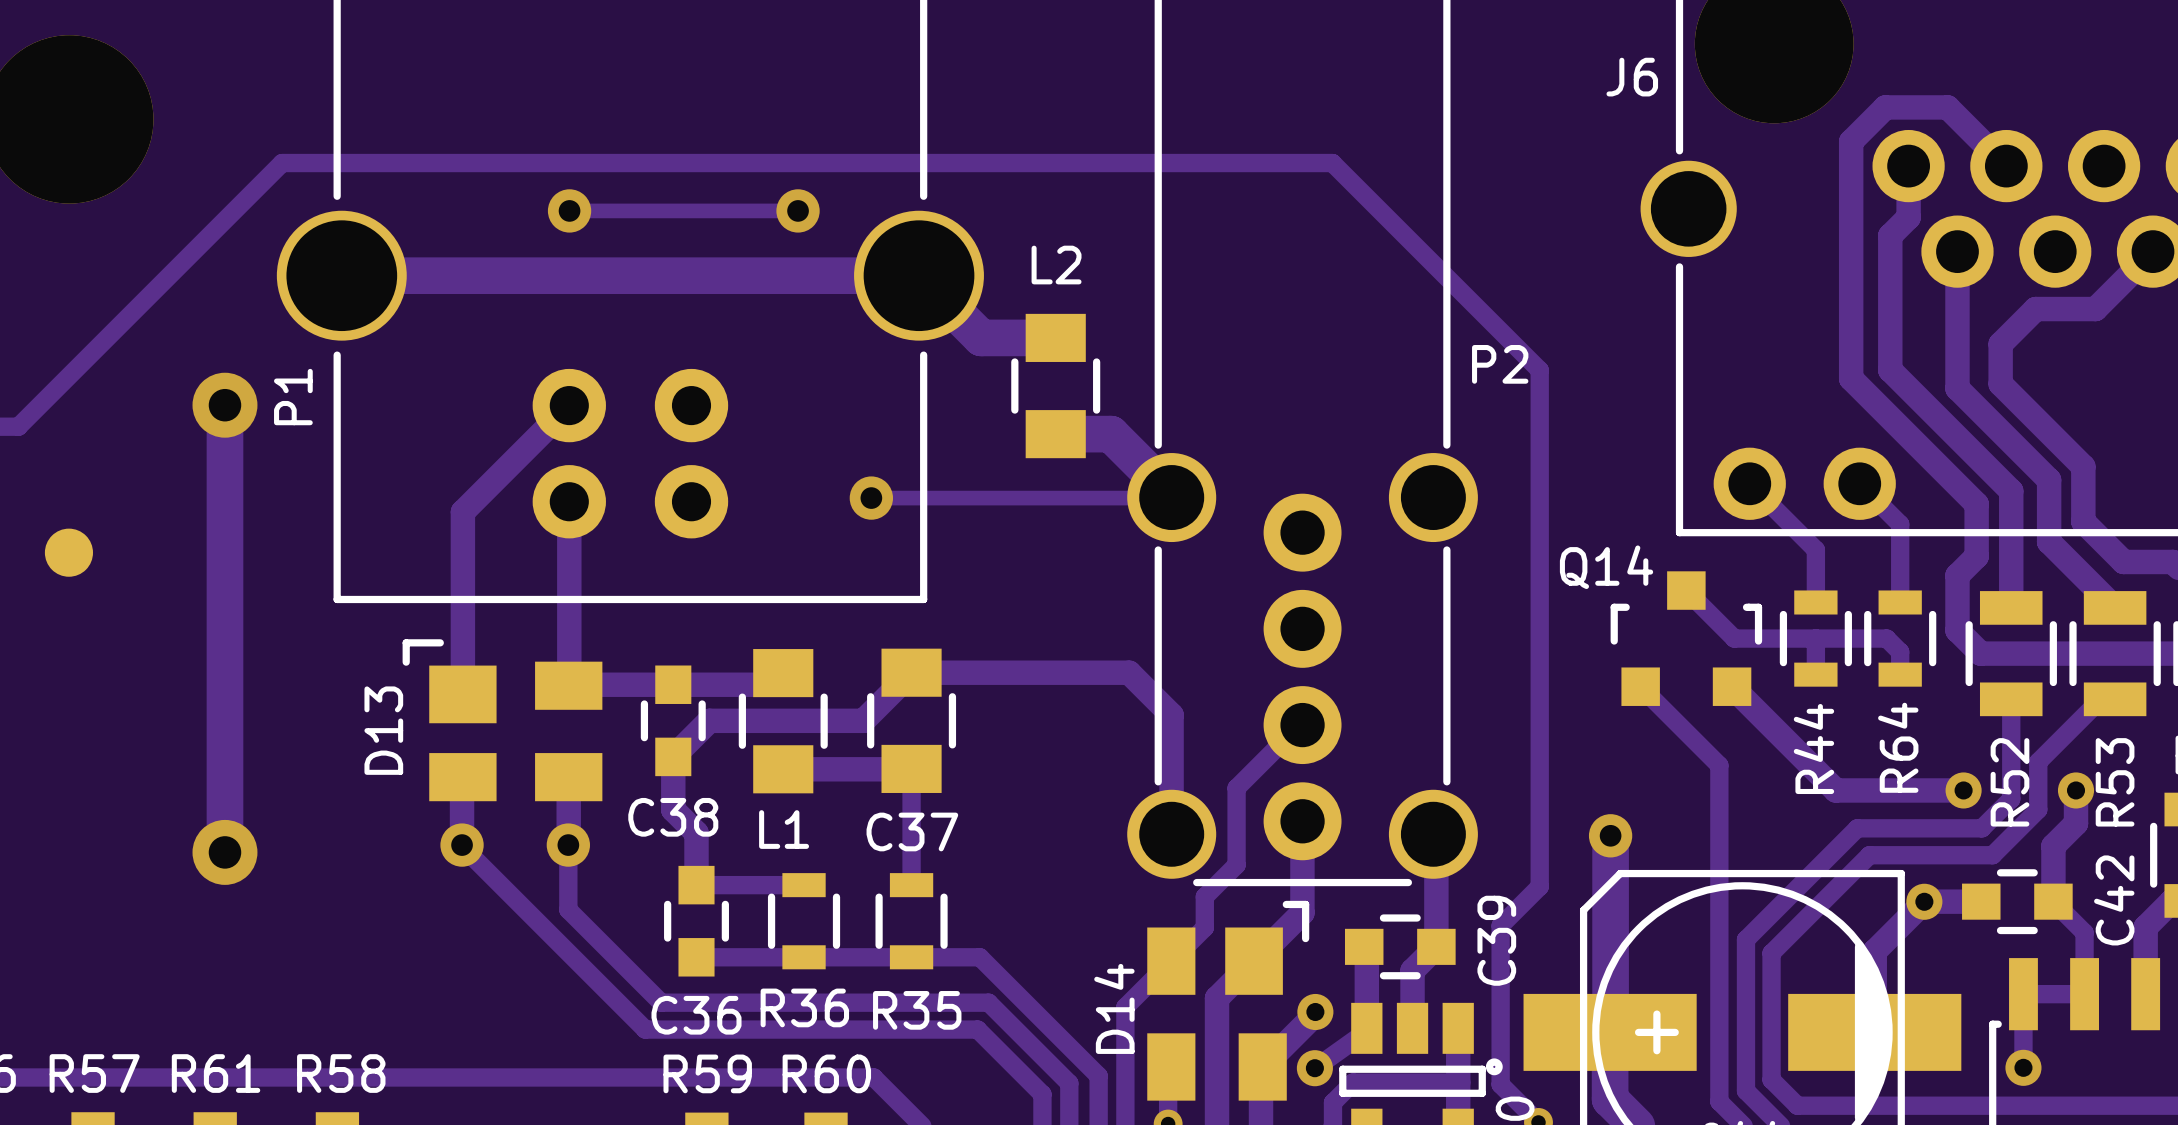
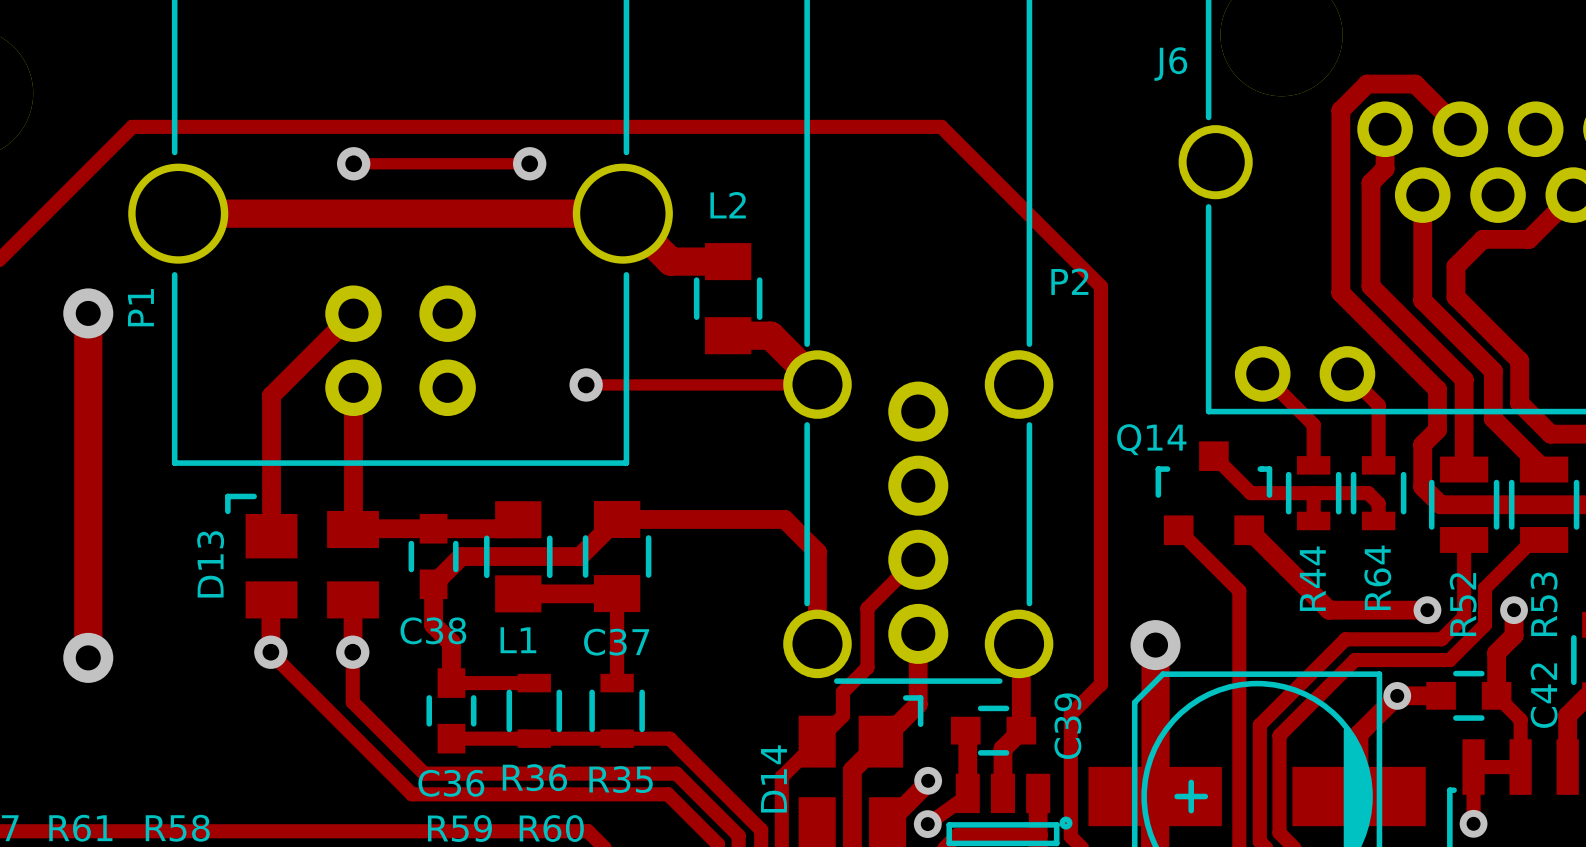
via size: [1588, 814, 1633, 858] -> [1130, 620, 1181, 671]

